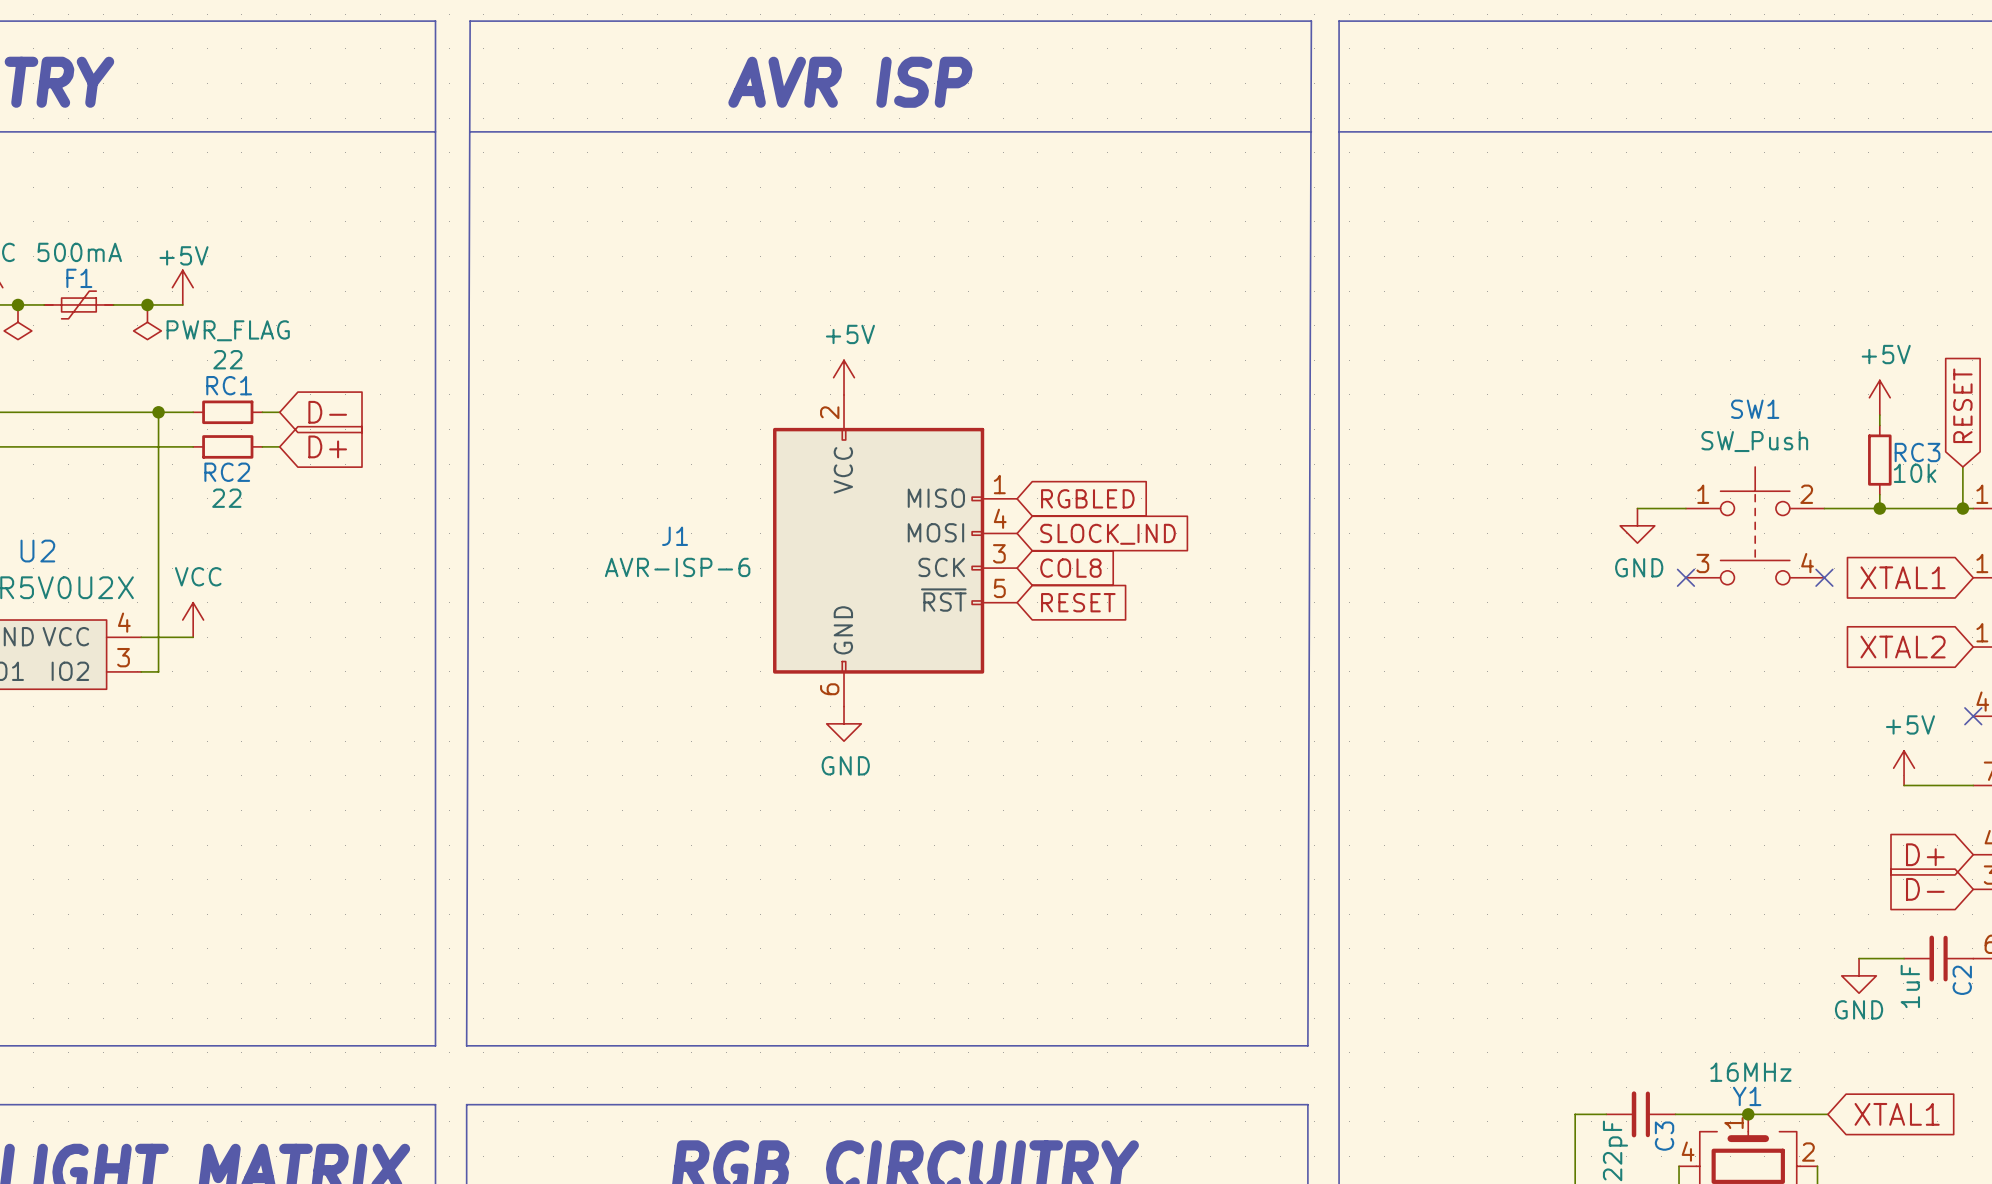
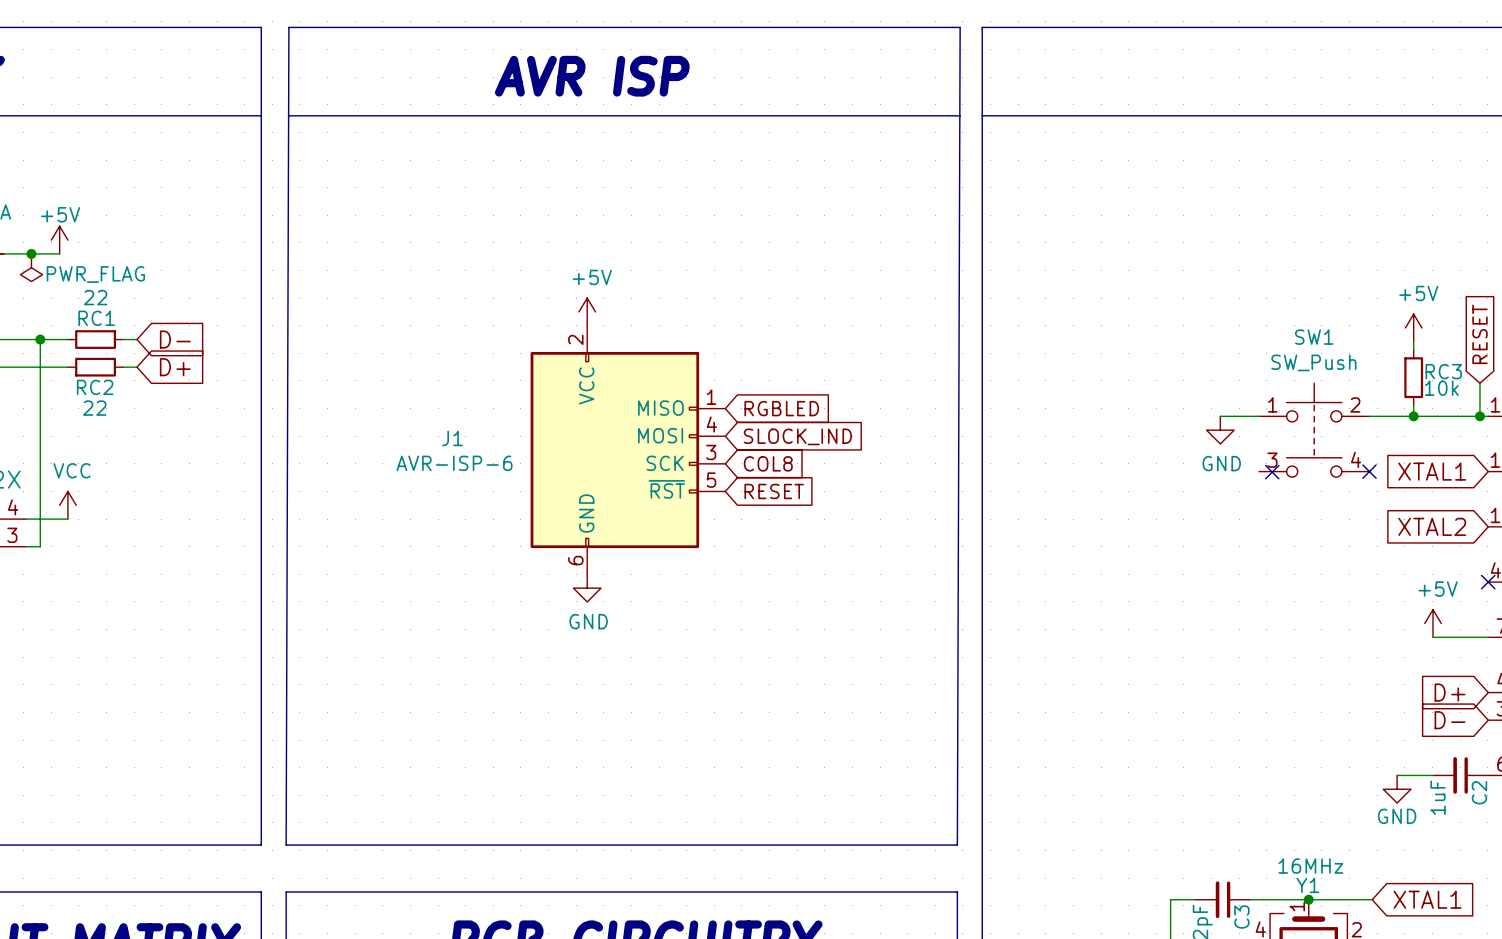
no-connect mark position: (1685, 577) -> (1272, 472)

